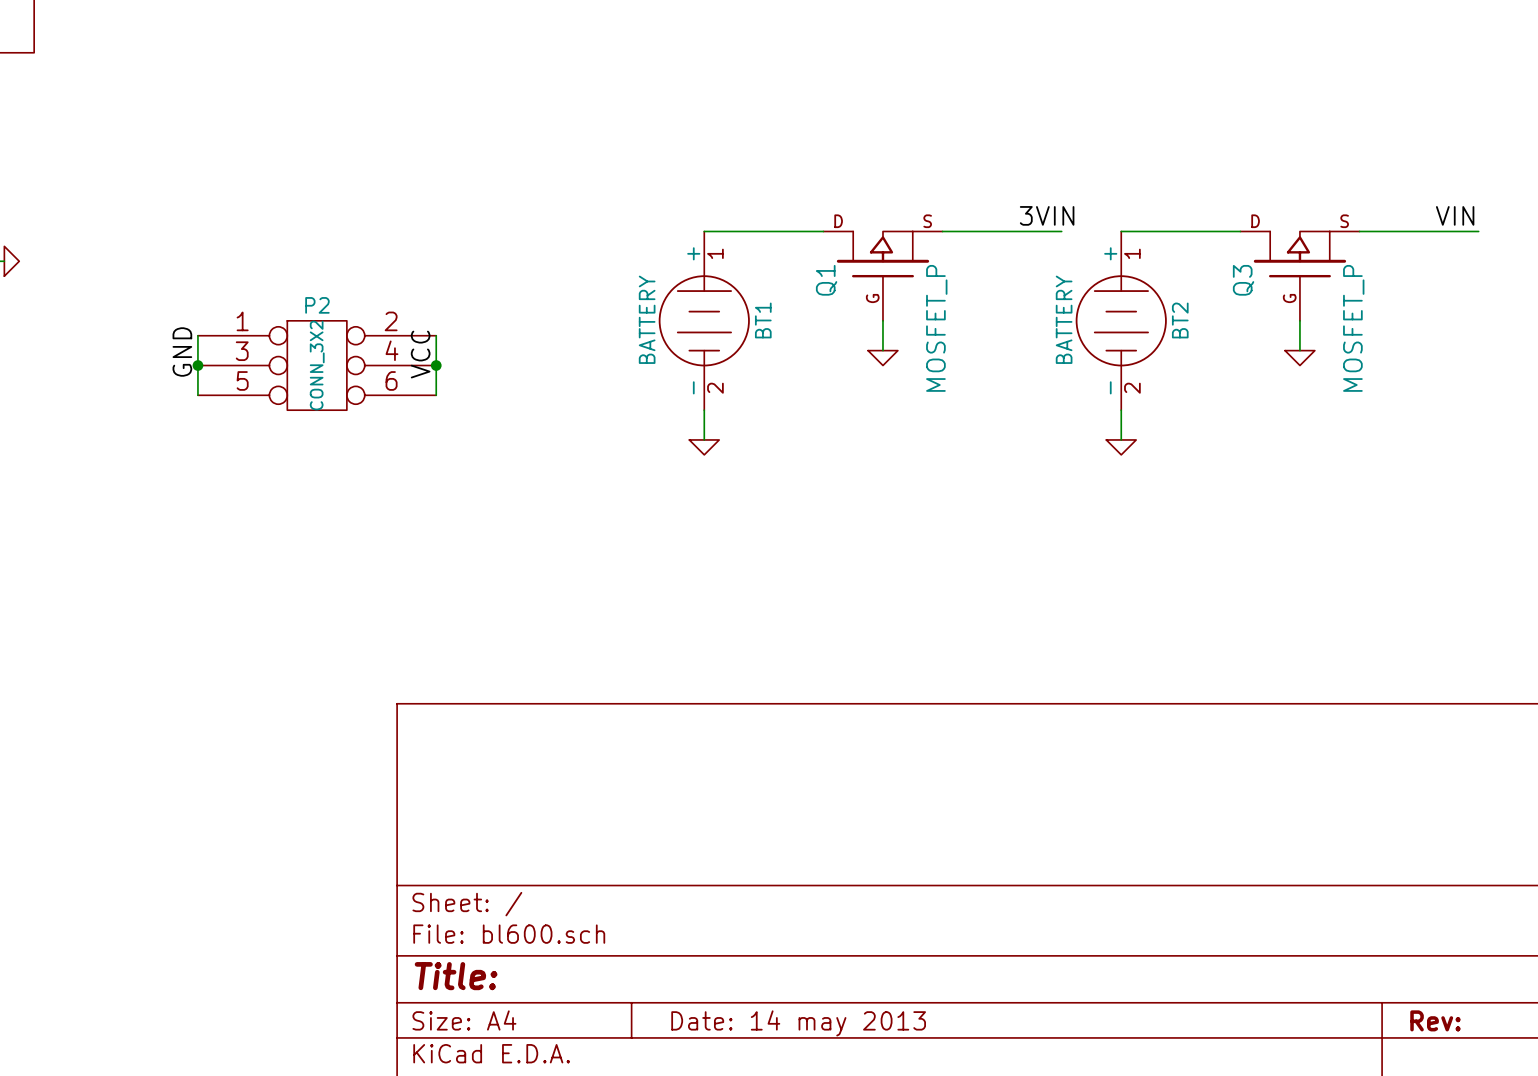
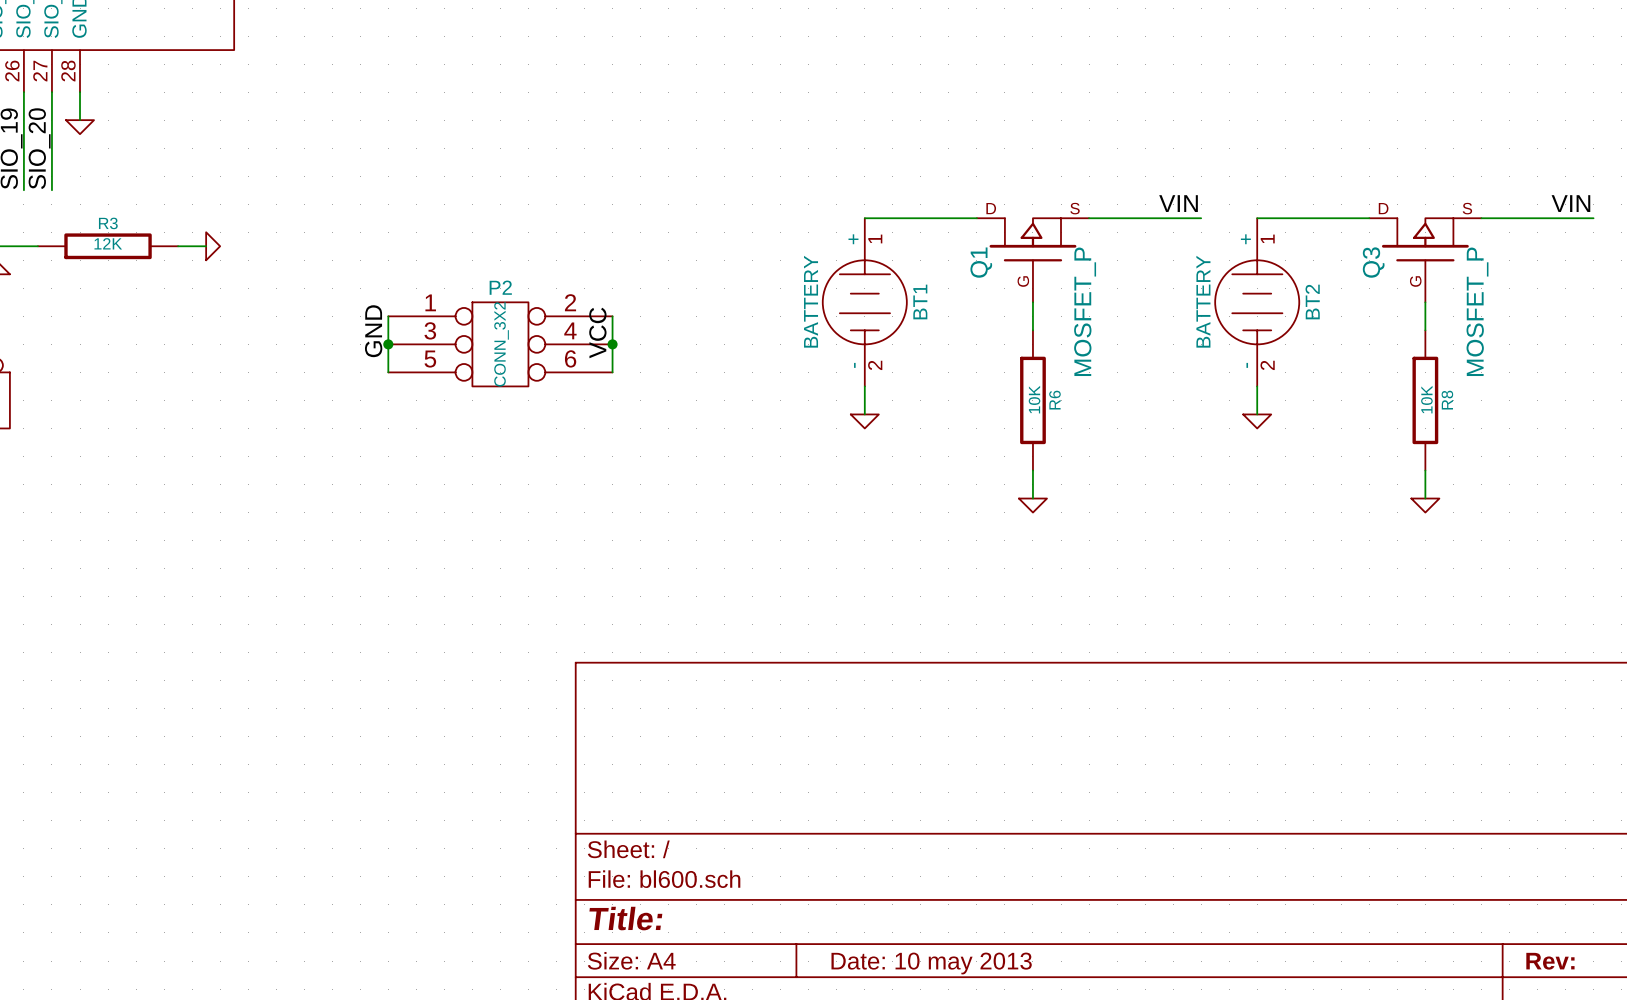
label: 3VIN (1047, 215) -> VIN (1178, 203)
power symbol position: (882, 358) -> (1032, 505)
power symbol position: (1299, 358) -> (1425, 505)
R6: none -> 10K (1032, 400)
R8: none -> 10K (1425, 400)
wire: none -> (1032, 470) (1032, 498)
wire: none -> (1425, 470) (1425, 498)
title block: Date: 14 may 2013 (798, 1023) -> Date: 10 may 2013 (931, 963)

